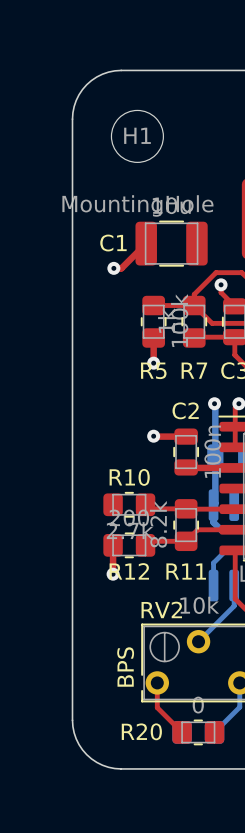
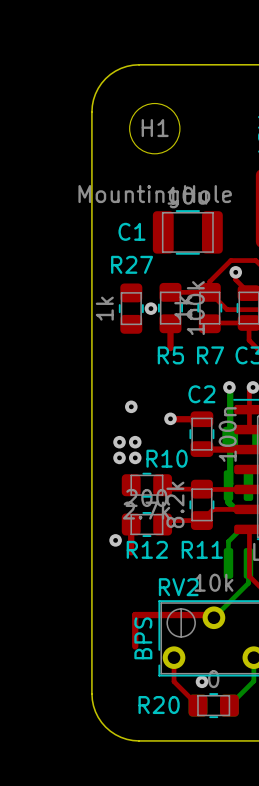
top track: (146, 243) (121, 268) (113, 268) -> none
via: (113, 268) -> none
R27: none -> 1k (131, 308)
via: none -> (150, 308)
via: (153, 363) -> none
via: none -> (131, 406)
via: none -> (119, 442)
via: none -> (135, 442)
via: none -> (119, 457)
via: none -> (135, 457)
R10 name position: R10 (129, 477) -> R10 (167, 458)
via position: (113, 574) -> (115, 540)
top track: none -> (213, 617) (211, 615) (135, 615) (135, 646)
via: none -> (202, 681)

